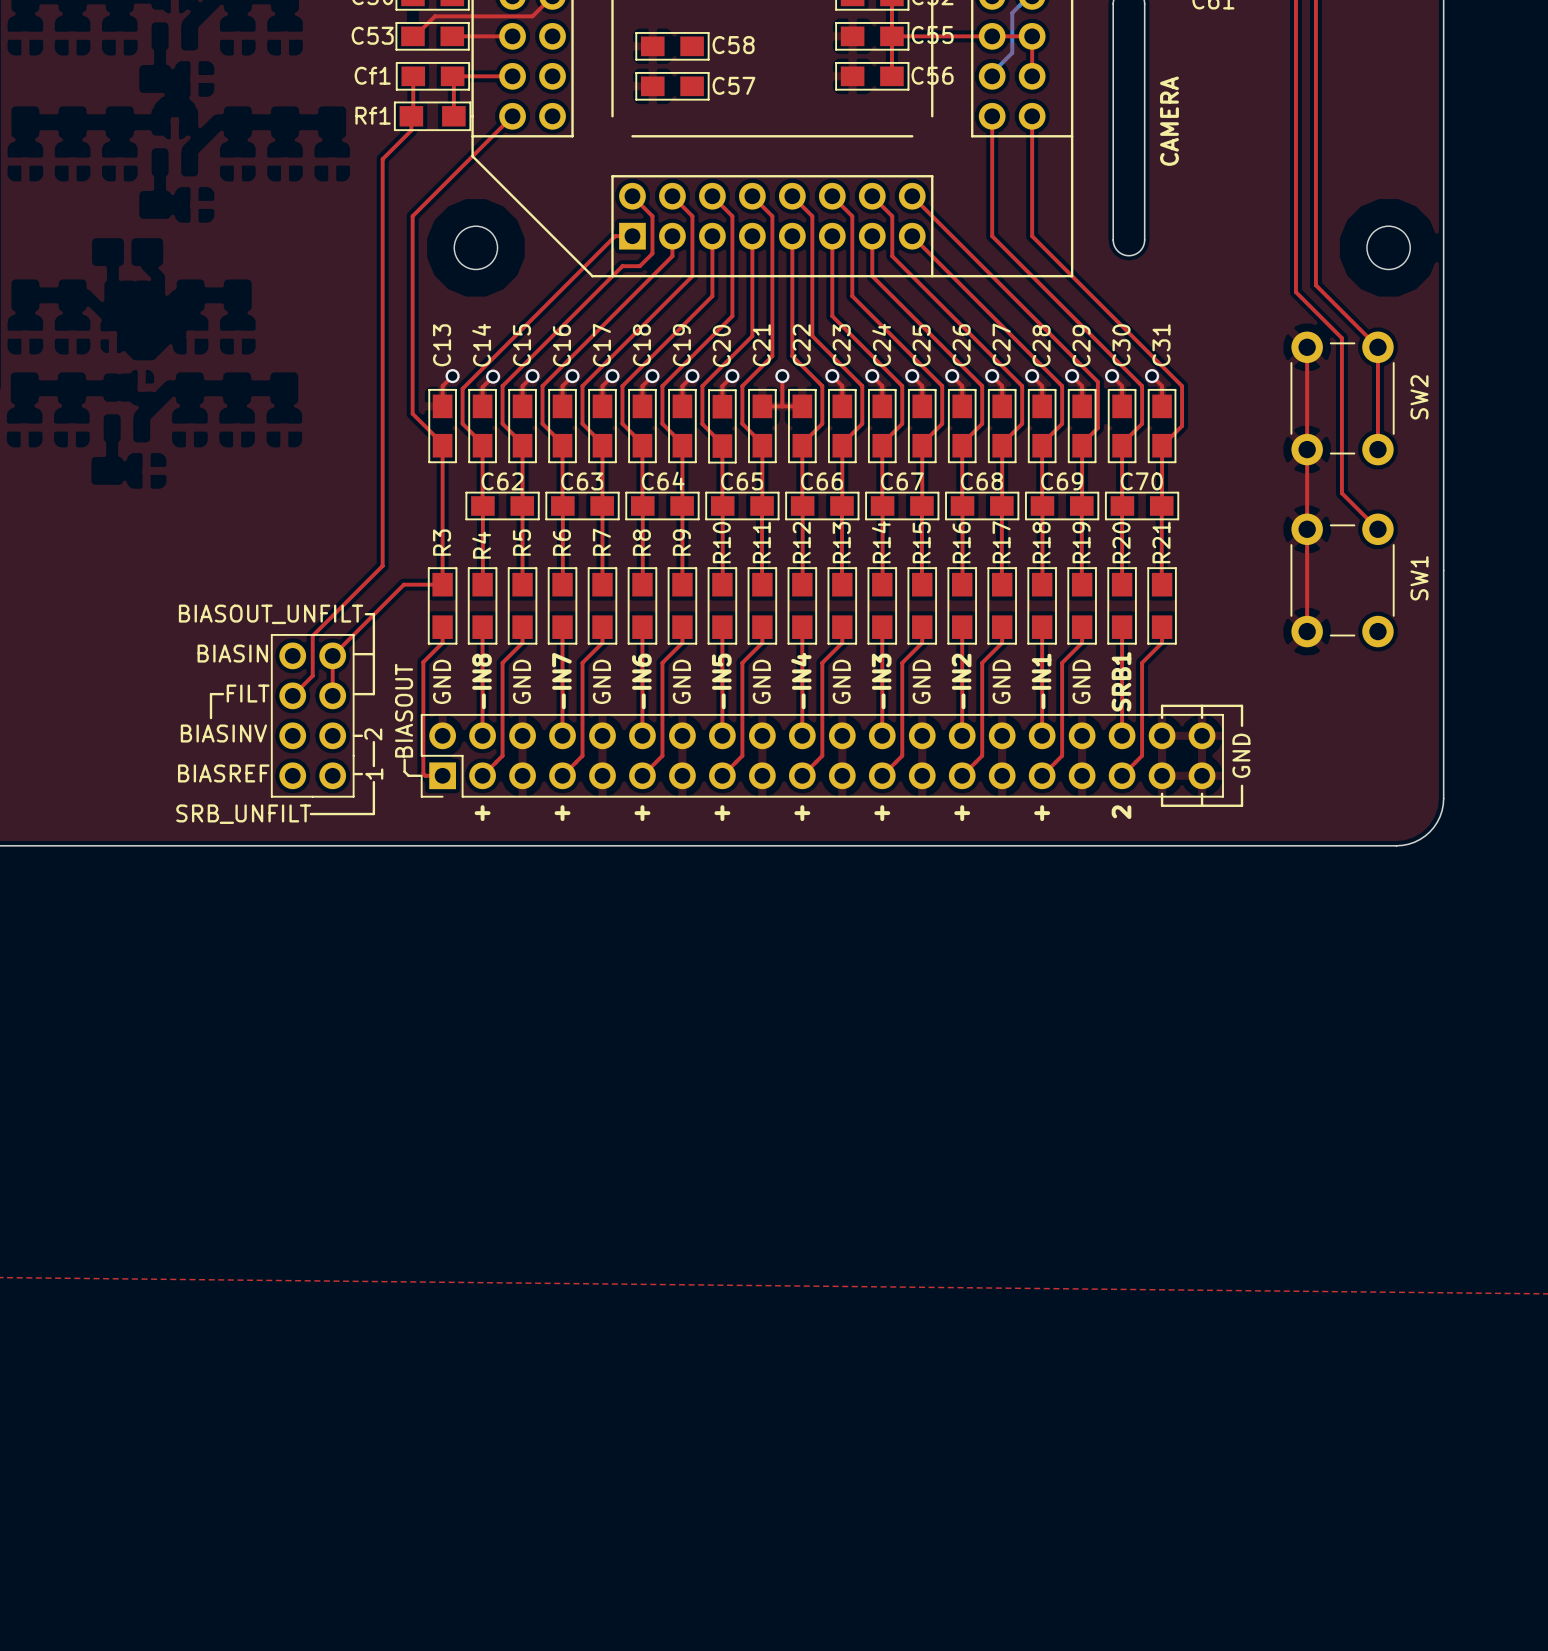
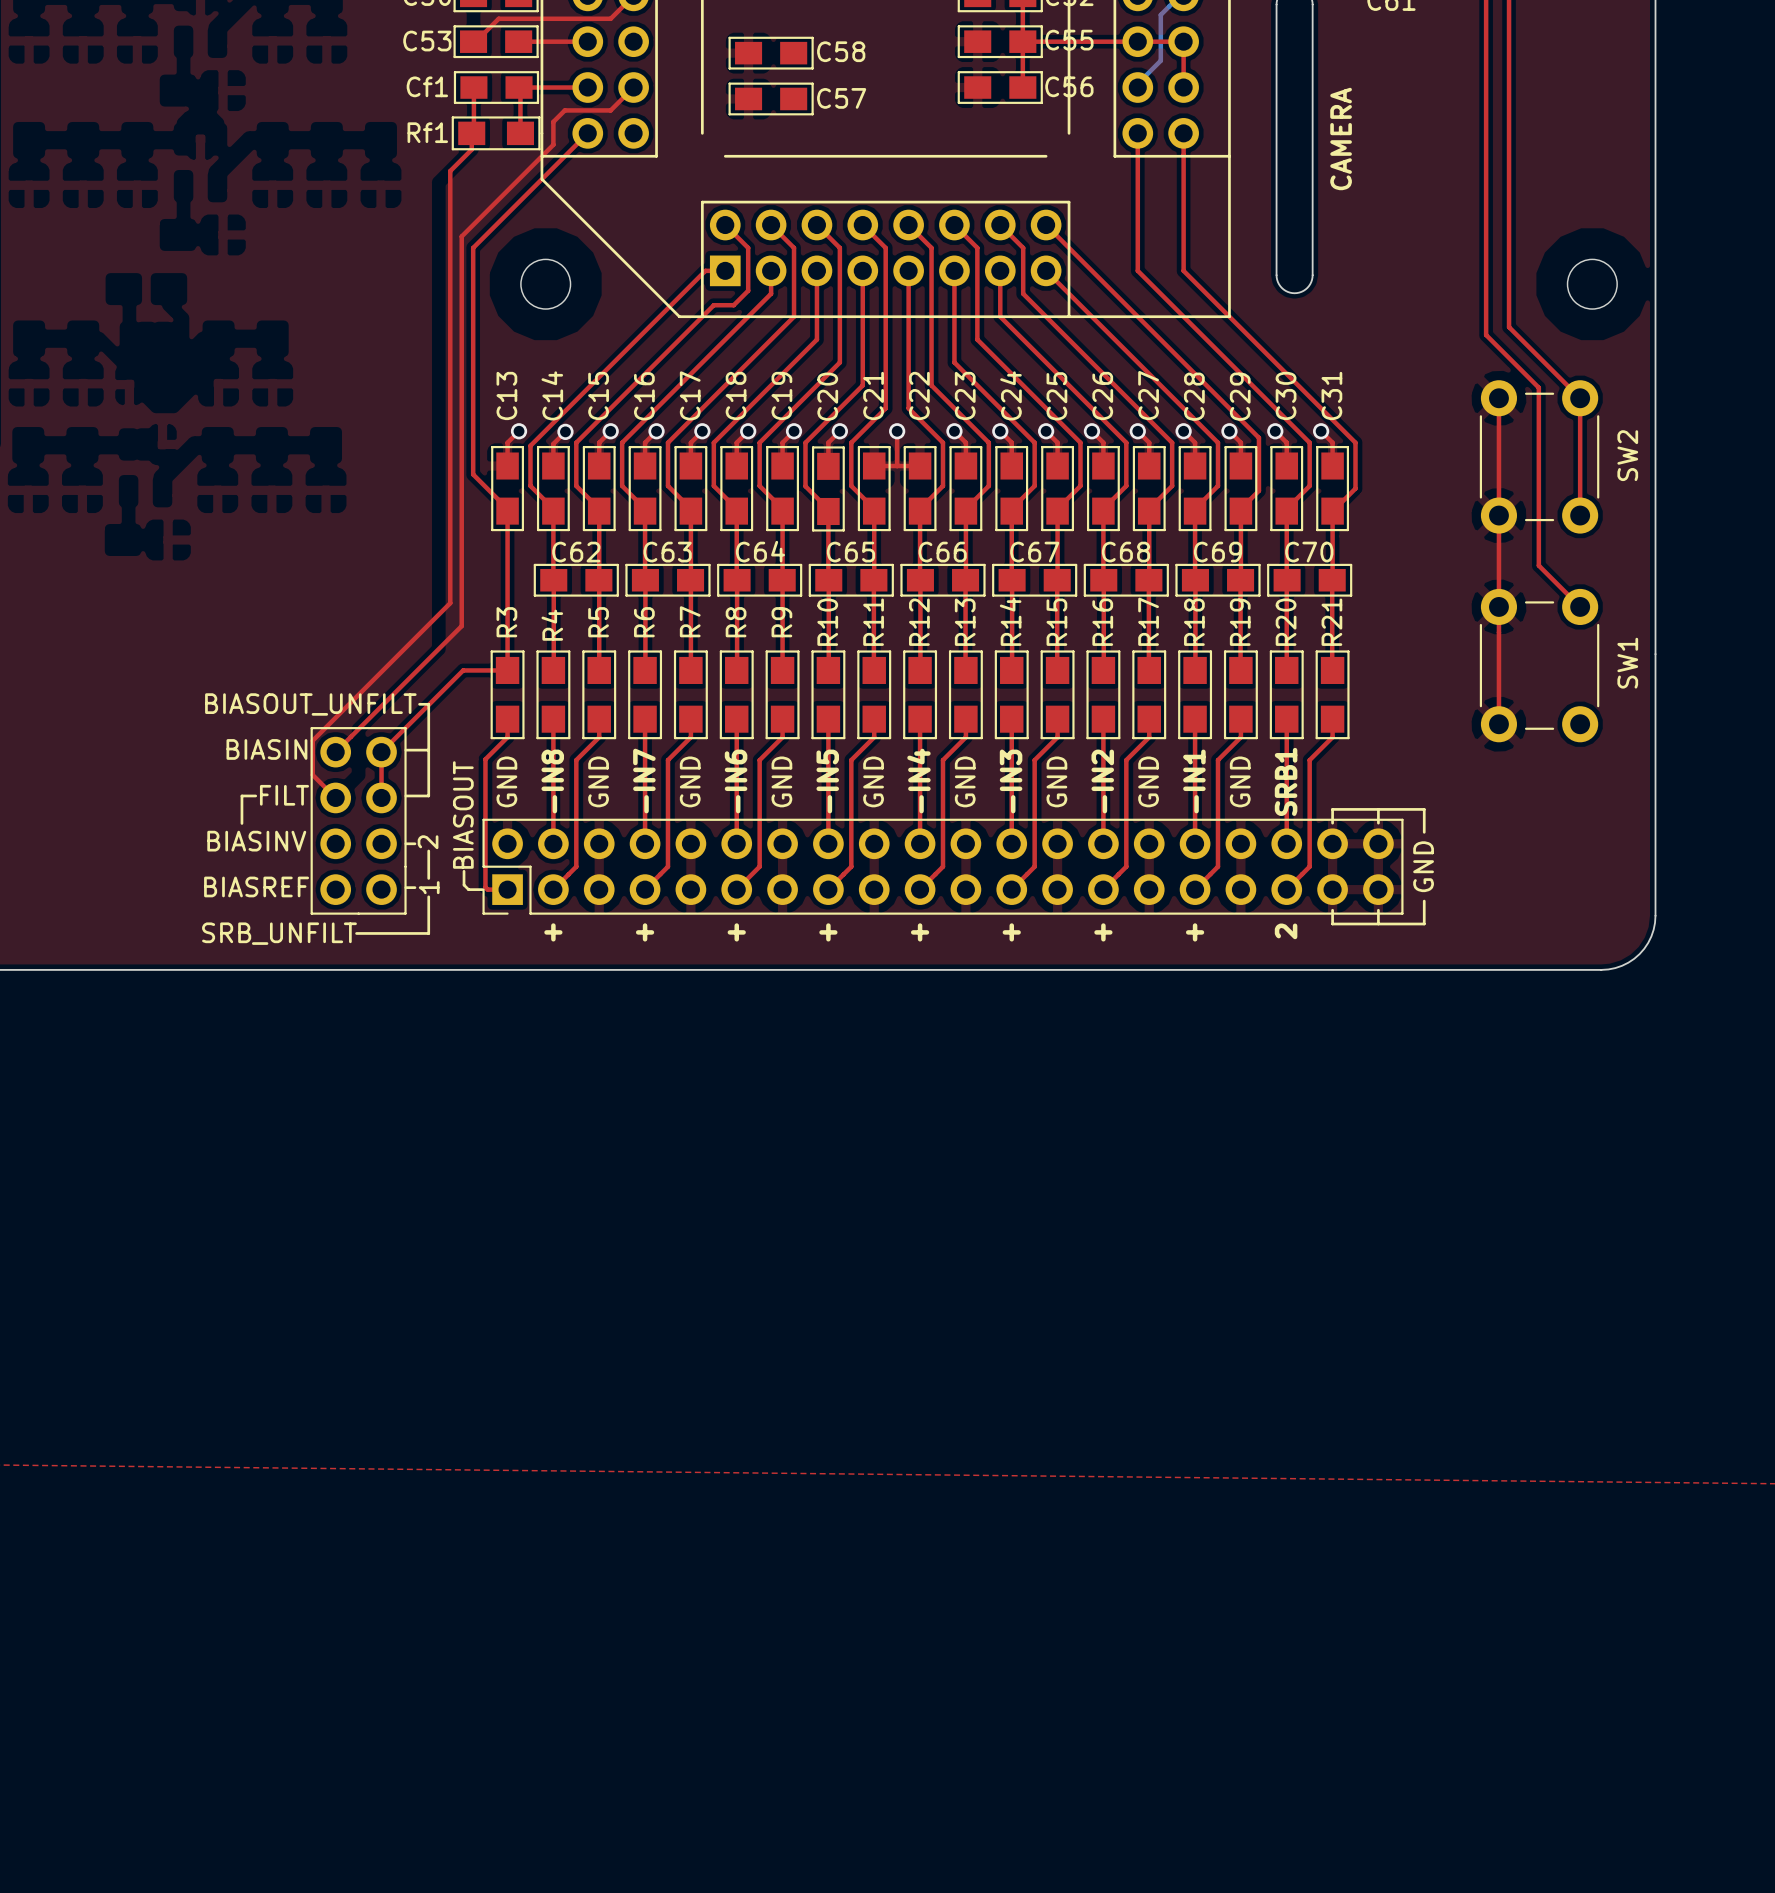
top track: none -> (633, 87) (610, 110) (564, 110) (553, 121) (553, 144) (461, 236) (461, 626) (438, 648)
top track: (392, 149) (382, 159) (382, 565) -> (450, 171) (450, 603) (312, 740) (312, 775) (335, 797)
top track: (312, 635) (312, 675) (292, 695) -> (358, 729) (335, 752)

